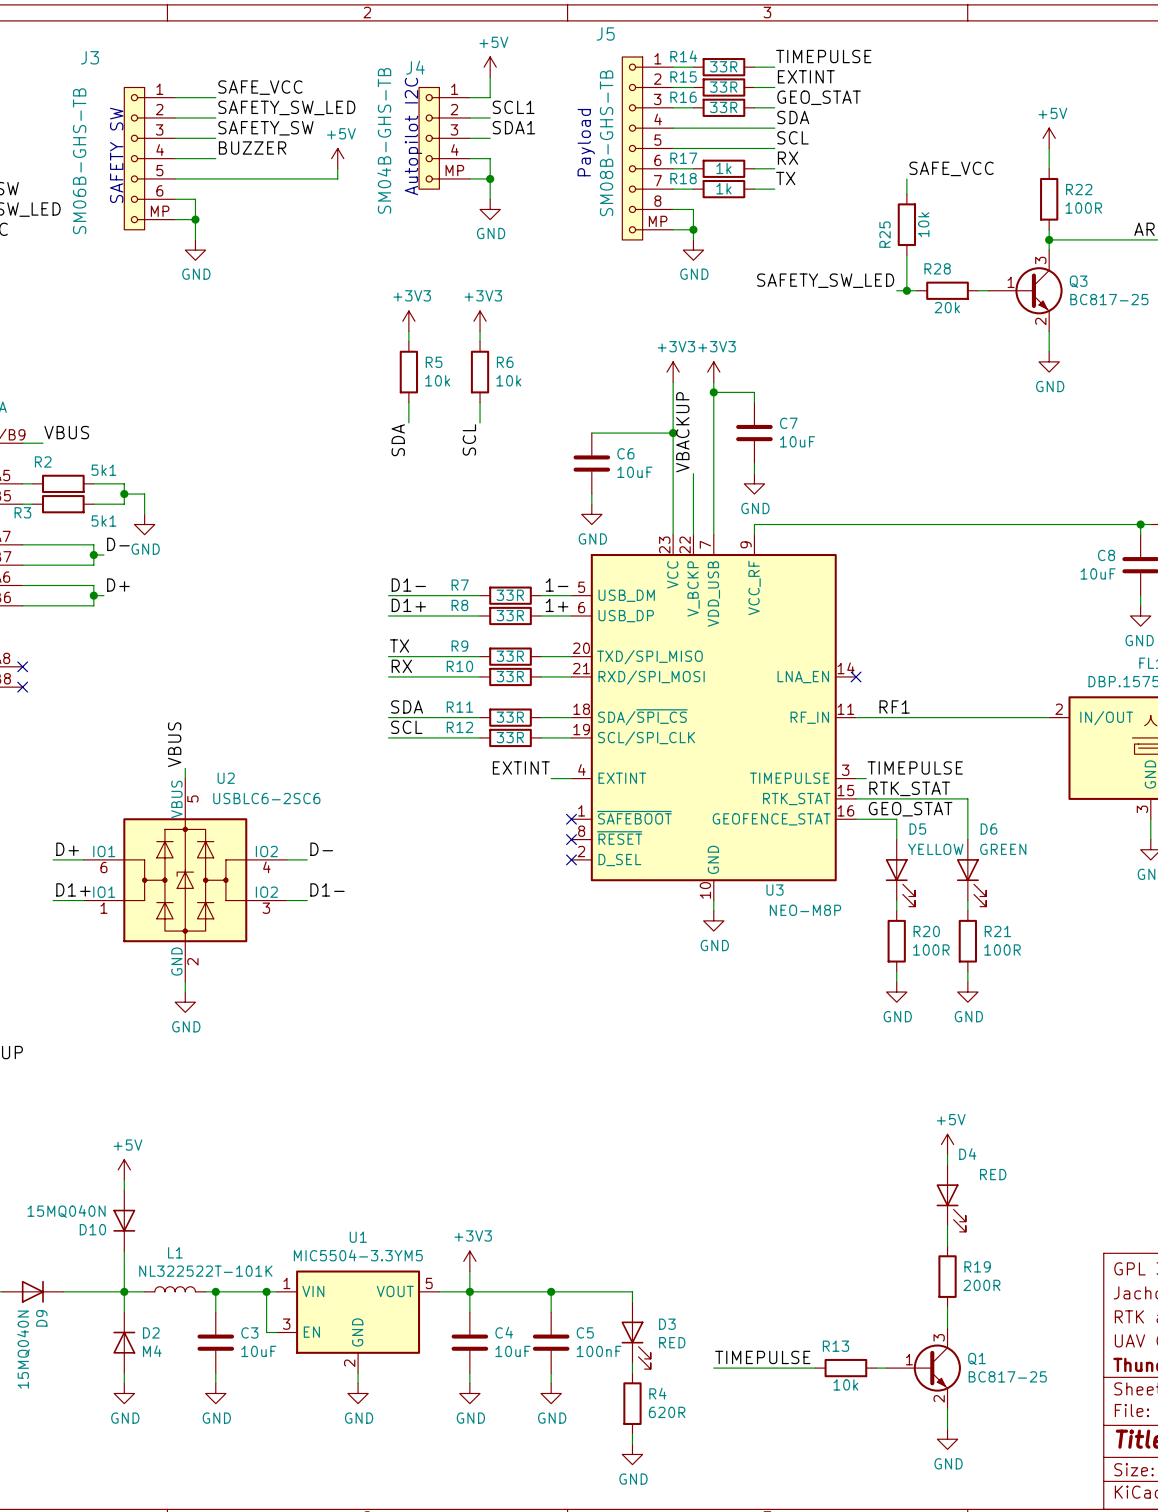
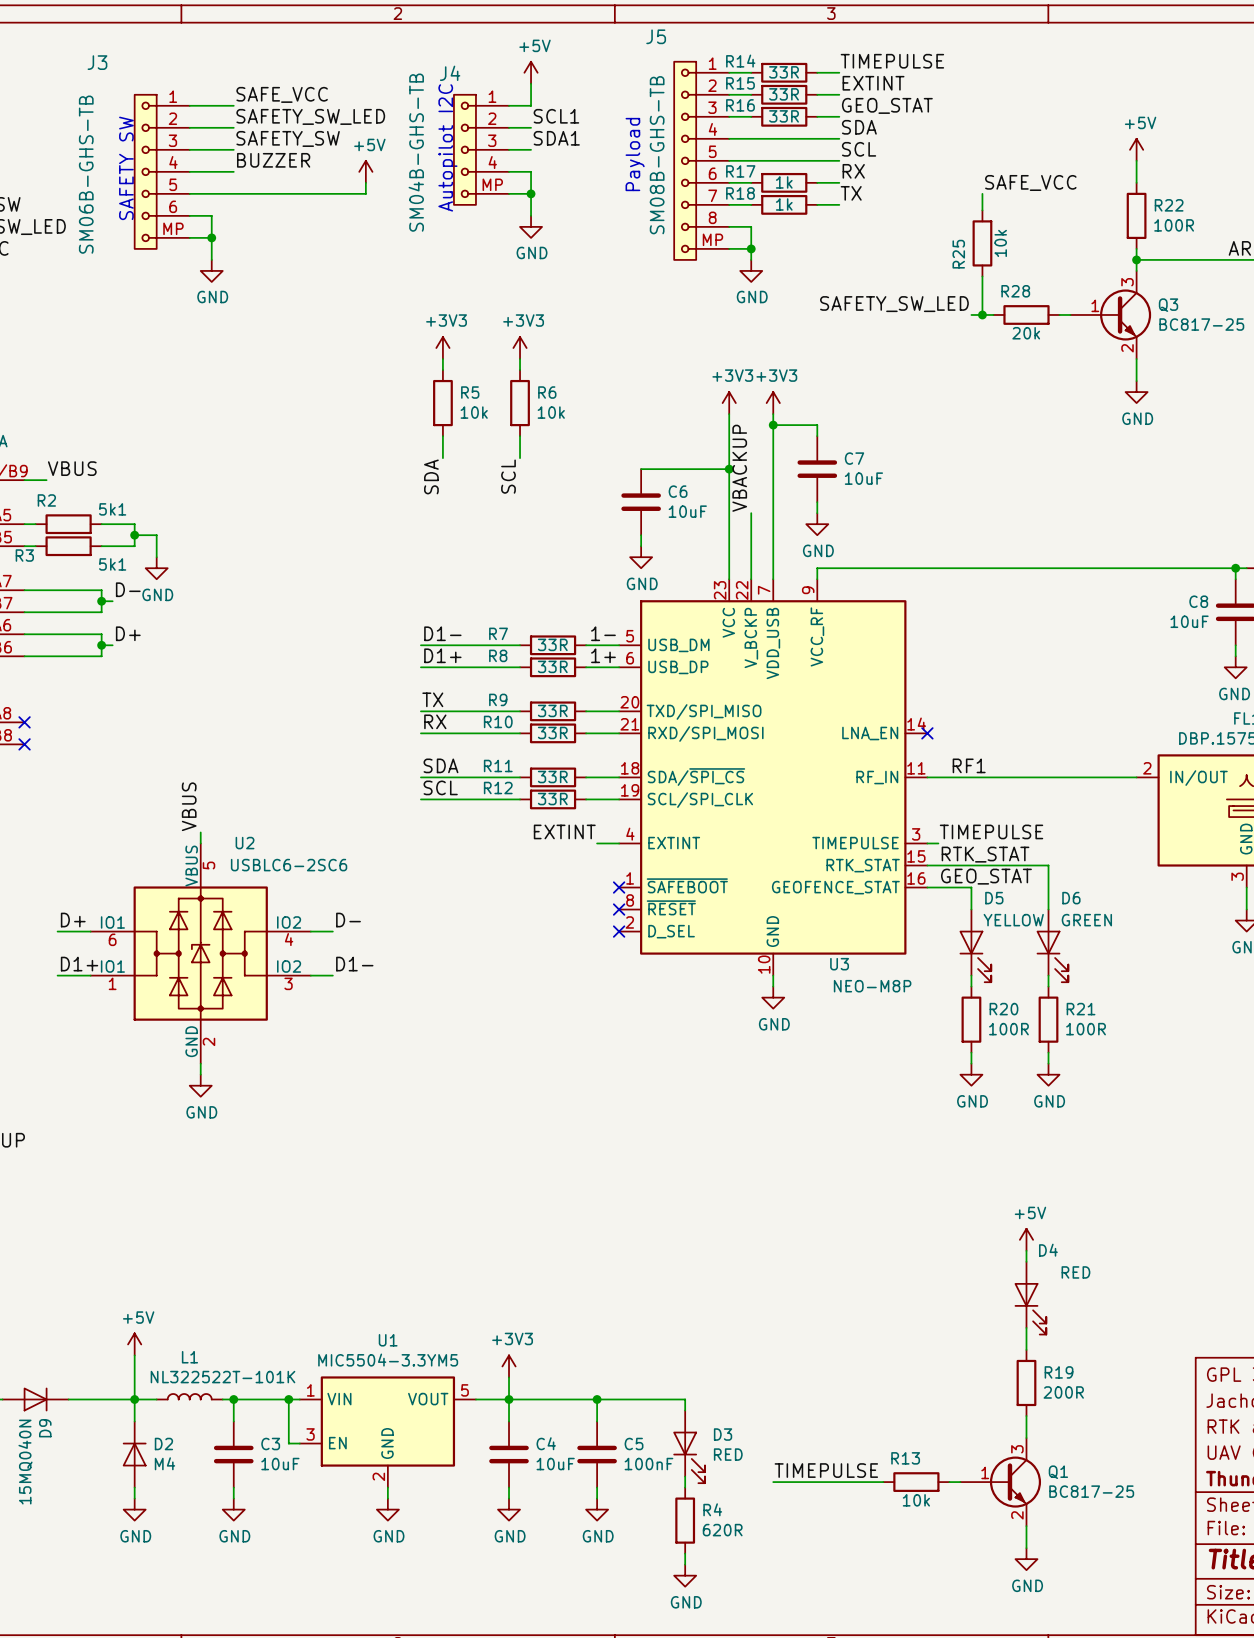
power symbol position: +5V (124, 1169) -> +5V (134, 1344)
wire: (124, 1180) (124, 1190) -> none
D10: 15MQ040N (124, 1220) -> none

